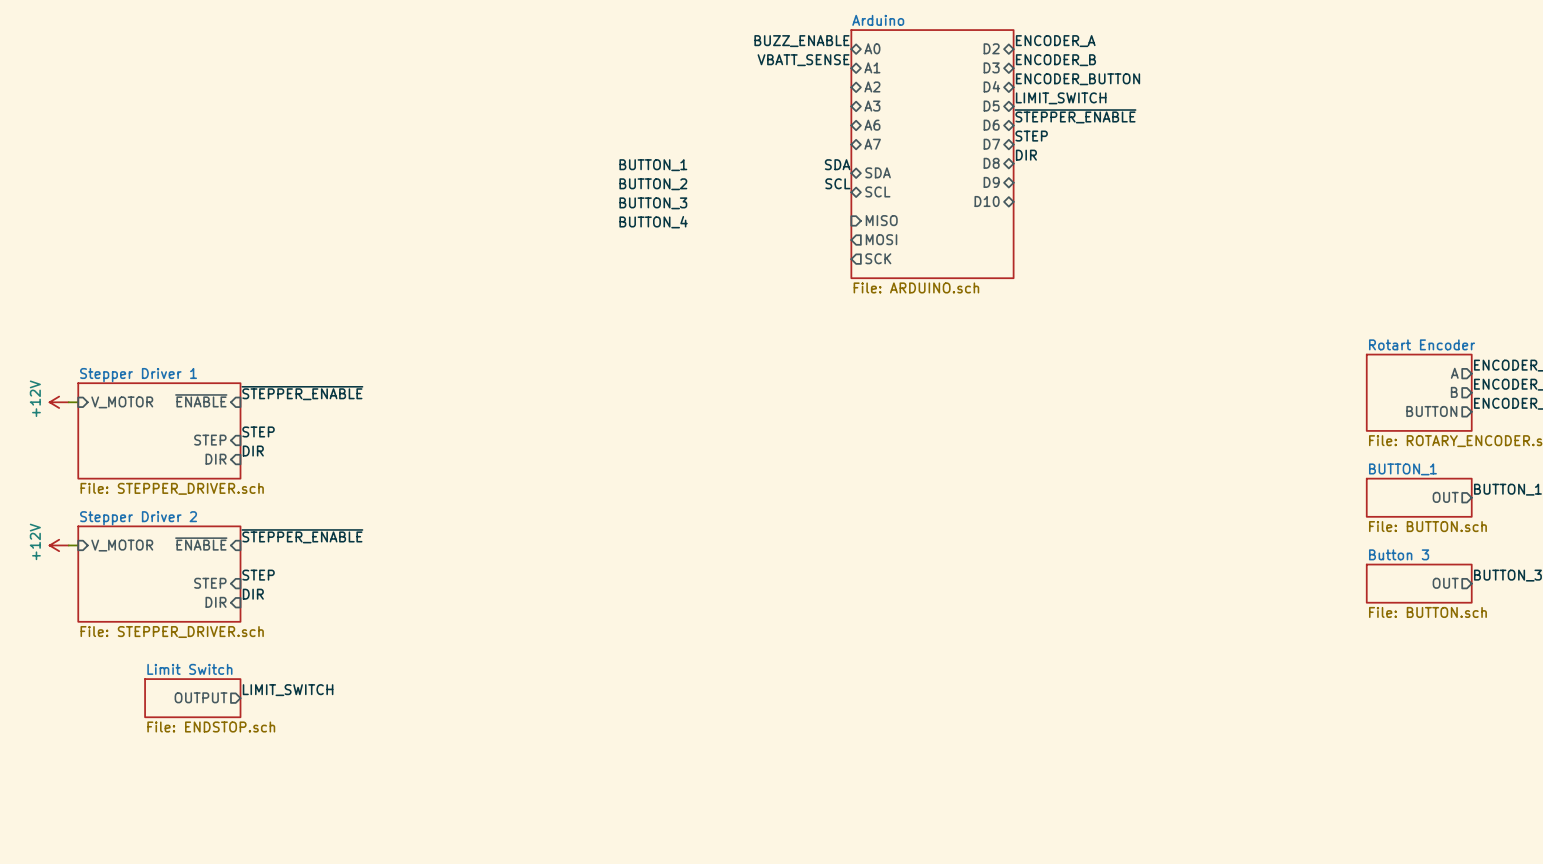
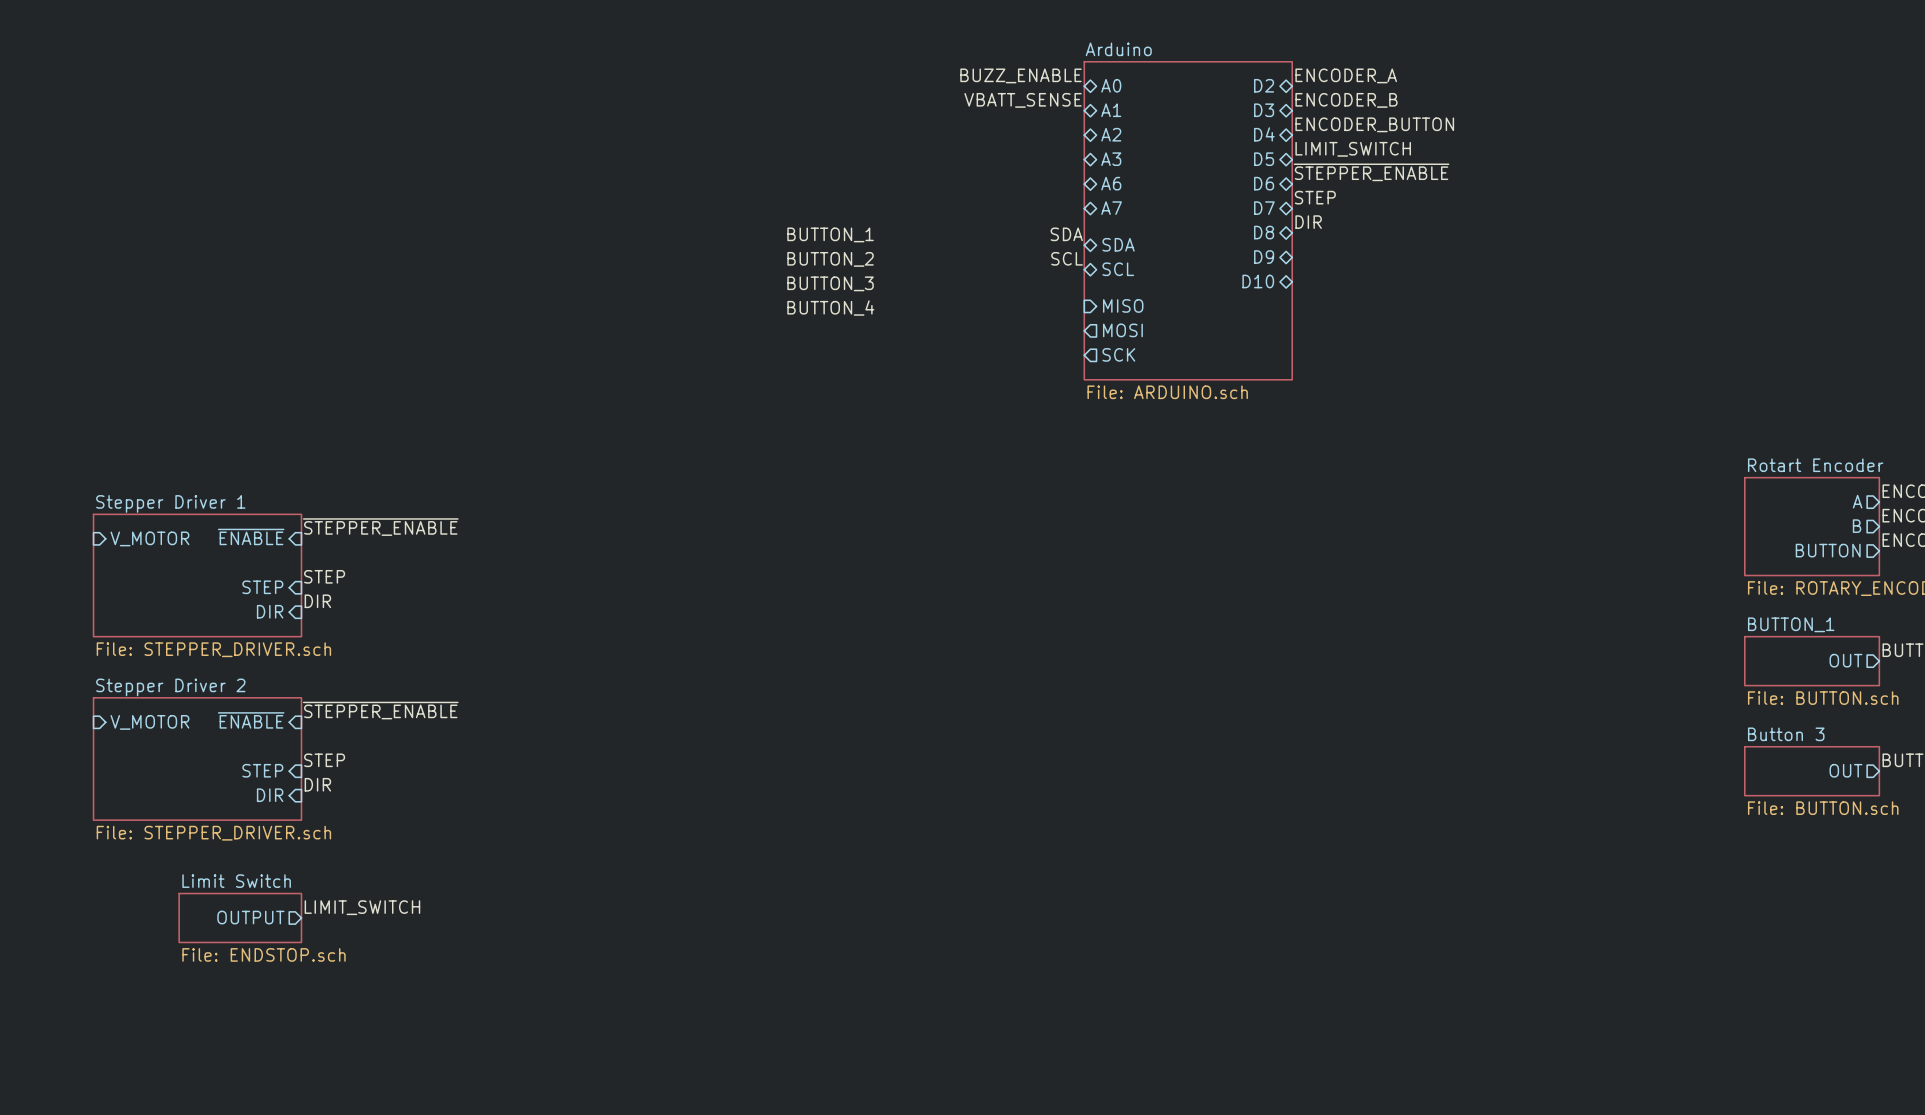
power symbol: +12V (59, 402) -> none
wire: (68, 402) (78, 402) -> none
power symbol: +12V (59, 545) -> none
wire: (68, 545) (78, 545) -> none

